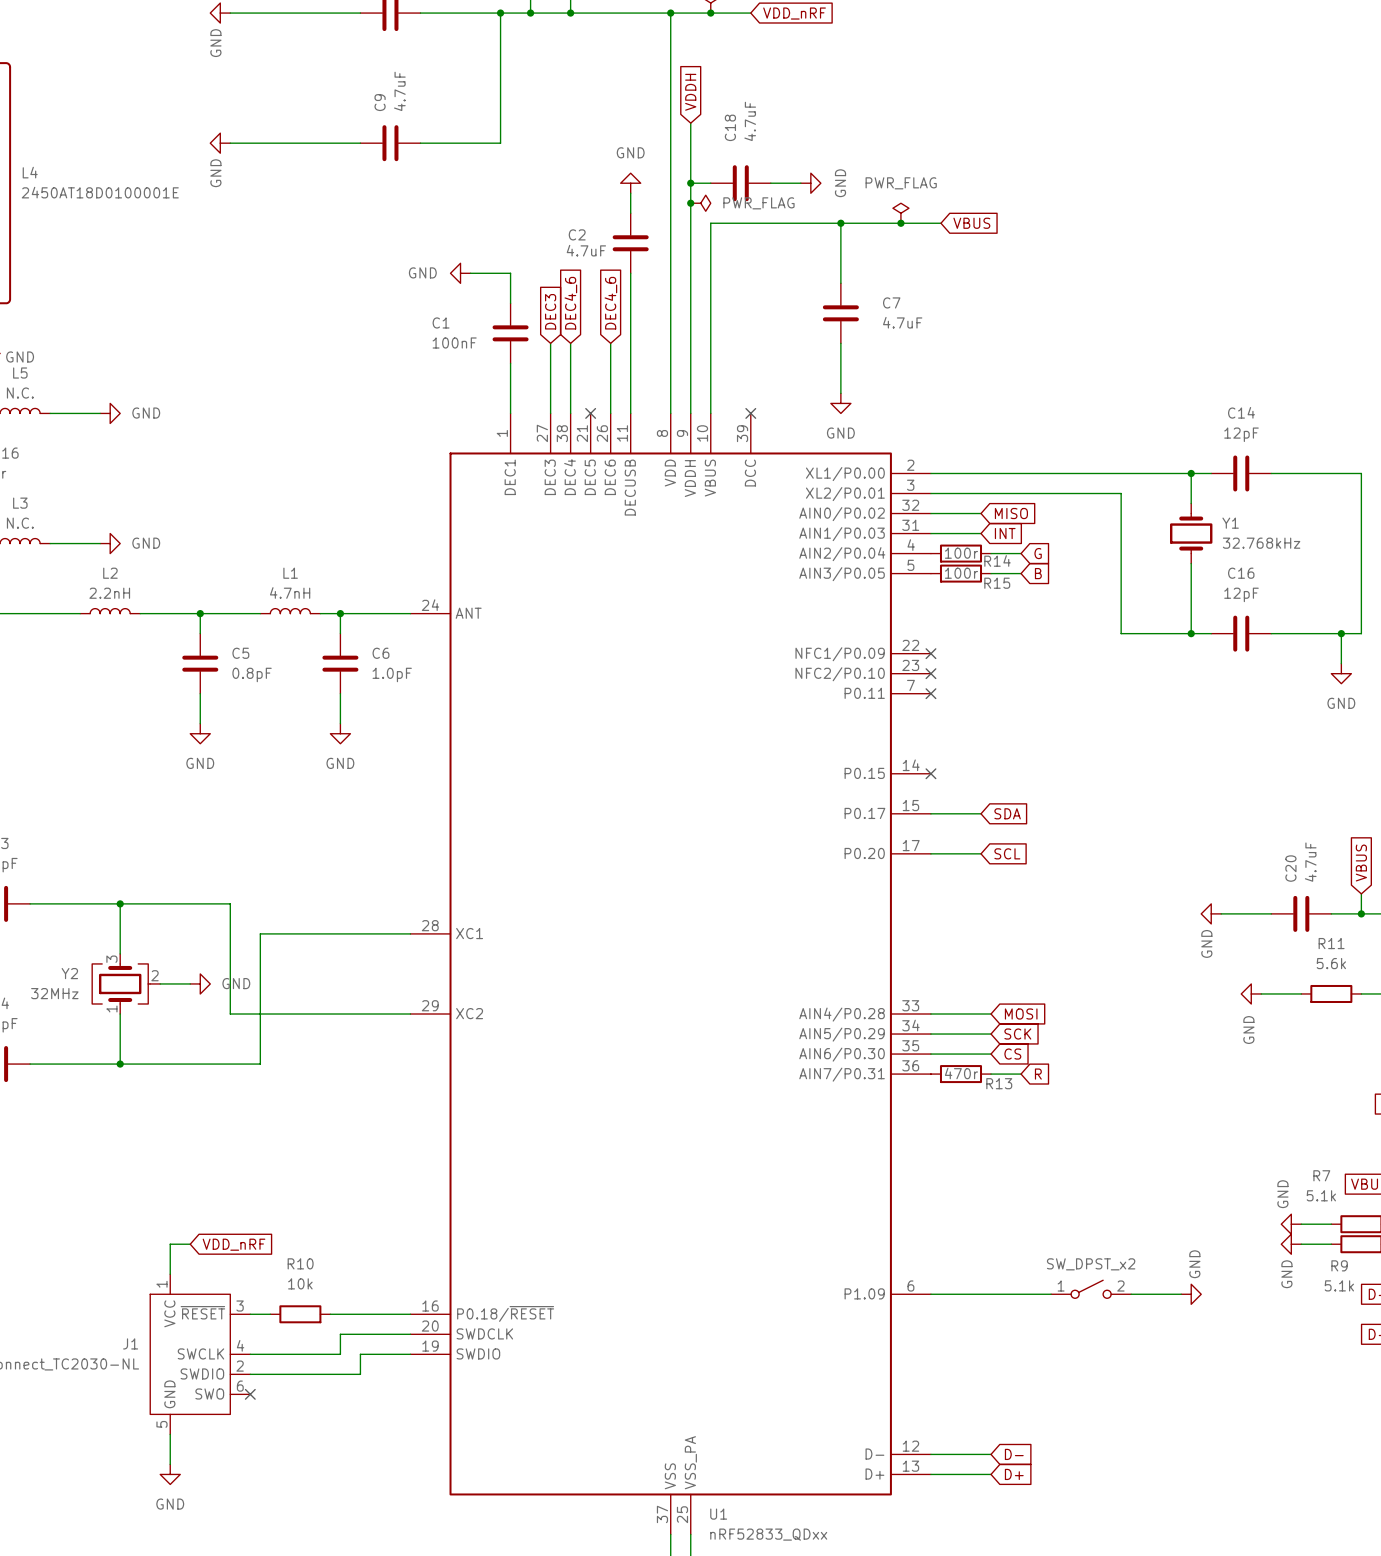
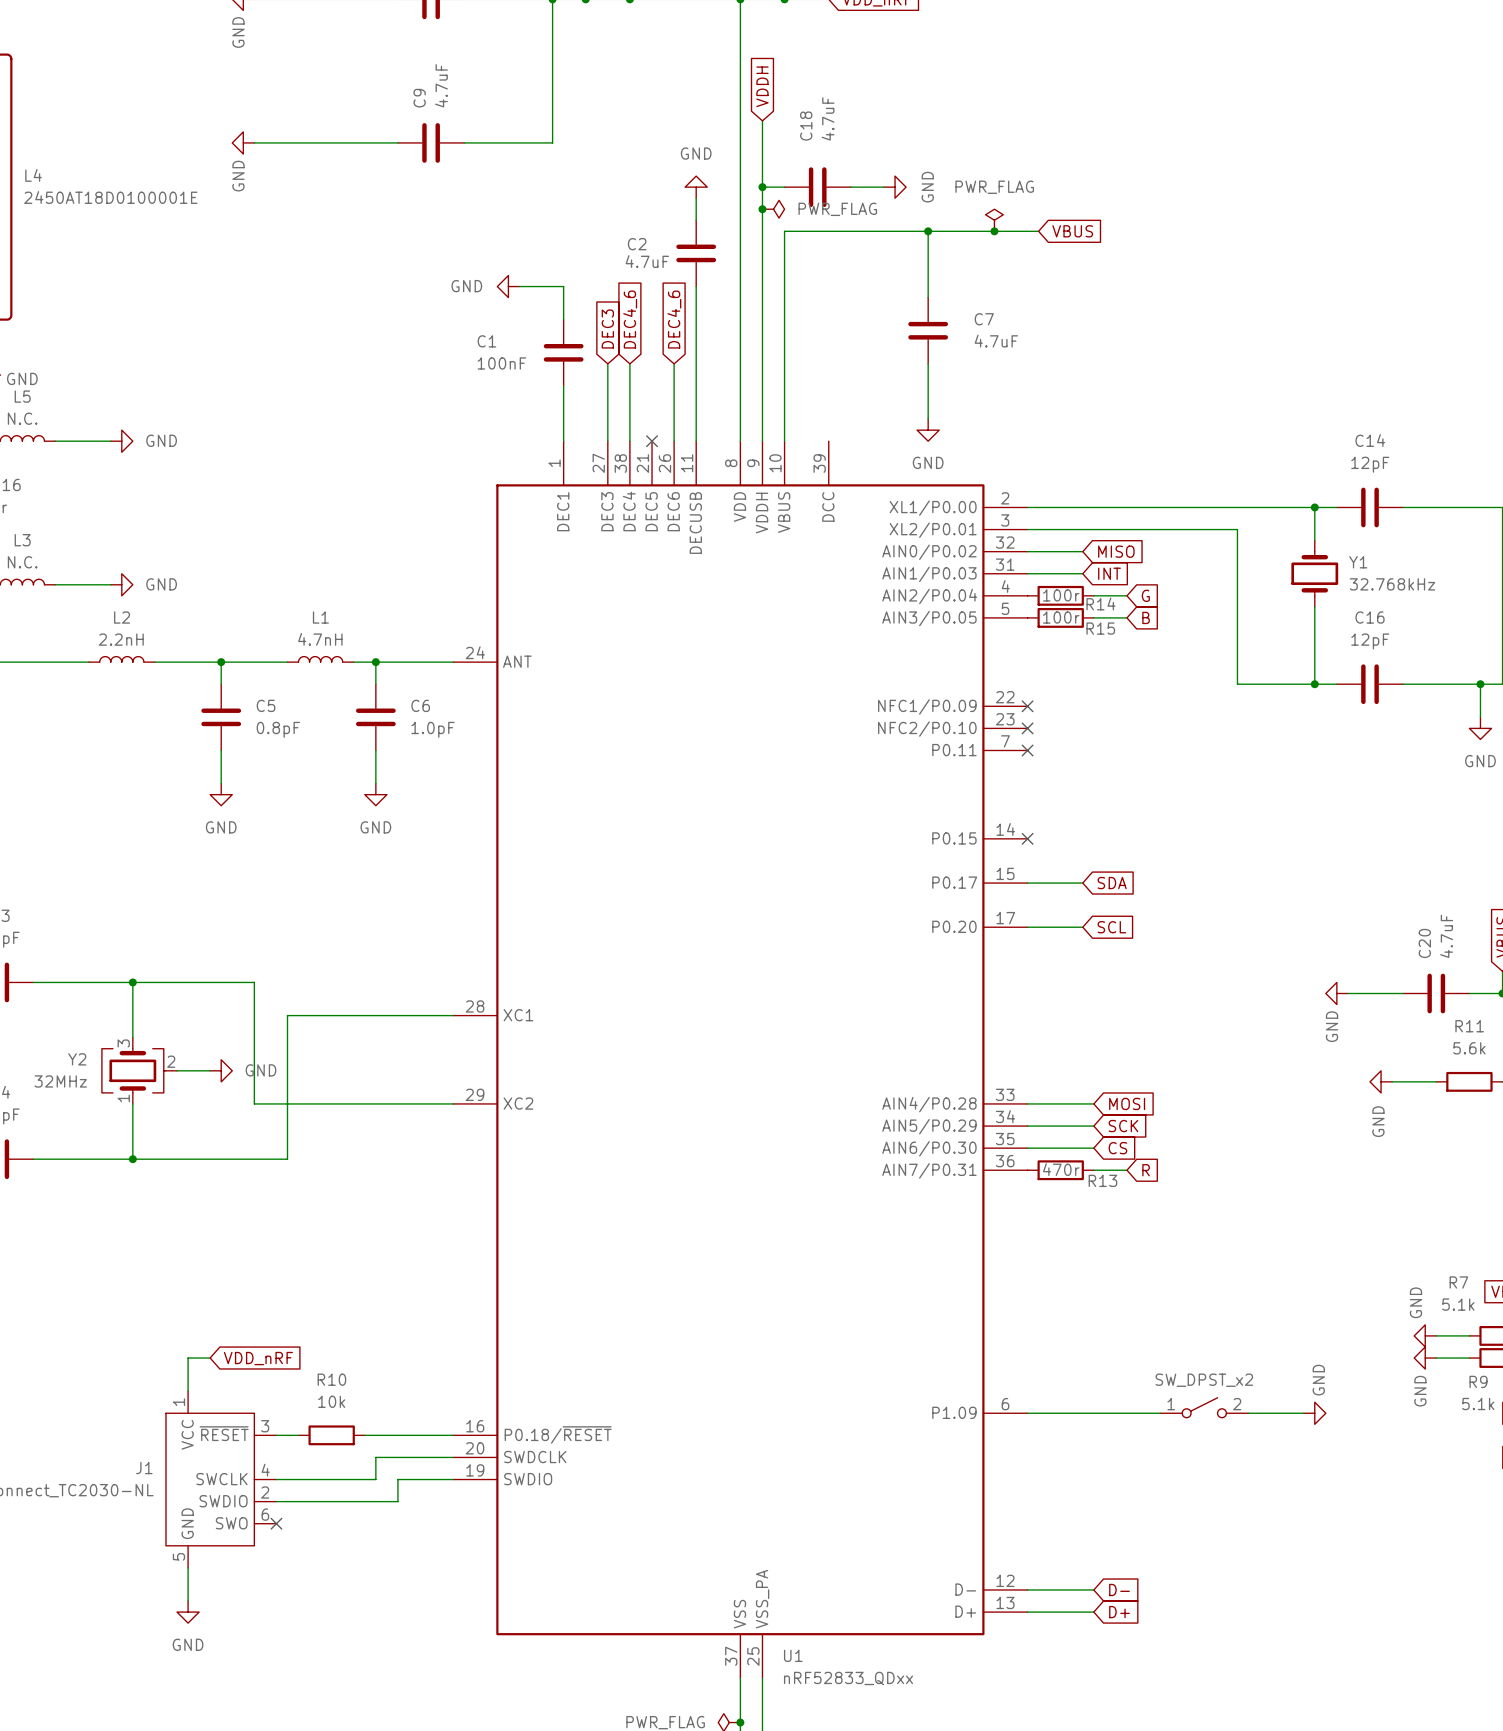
no-connect mark: (750, 413) -> none

